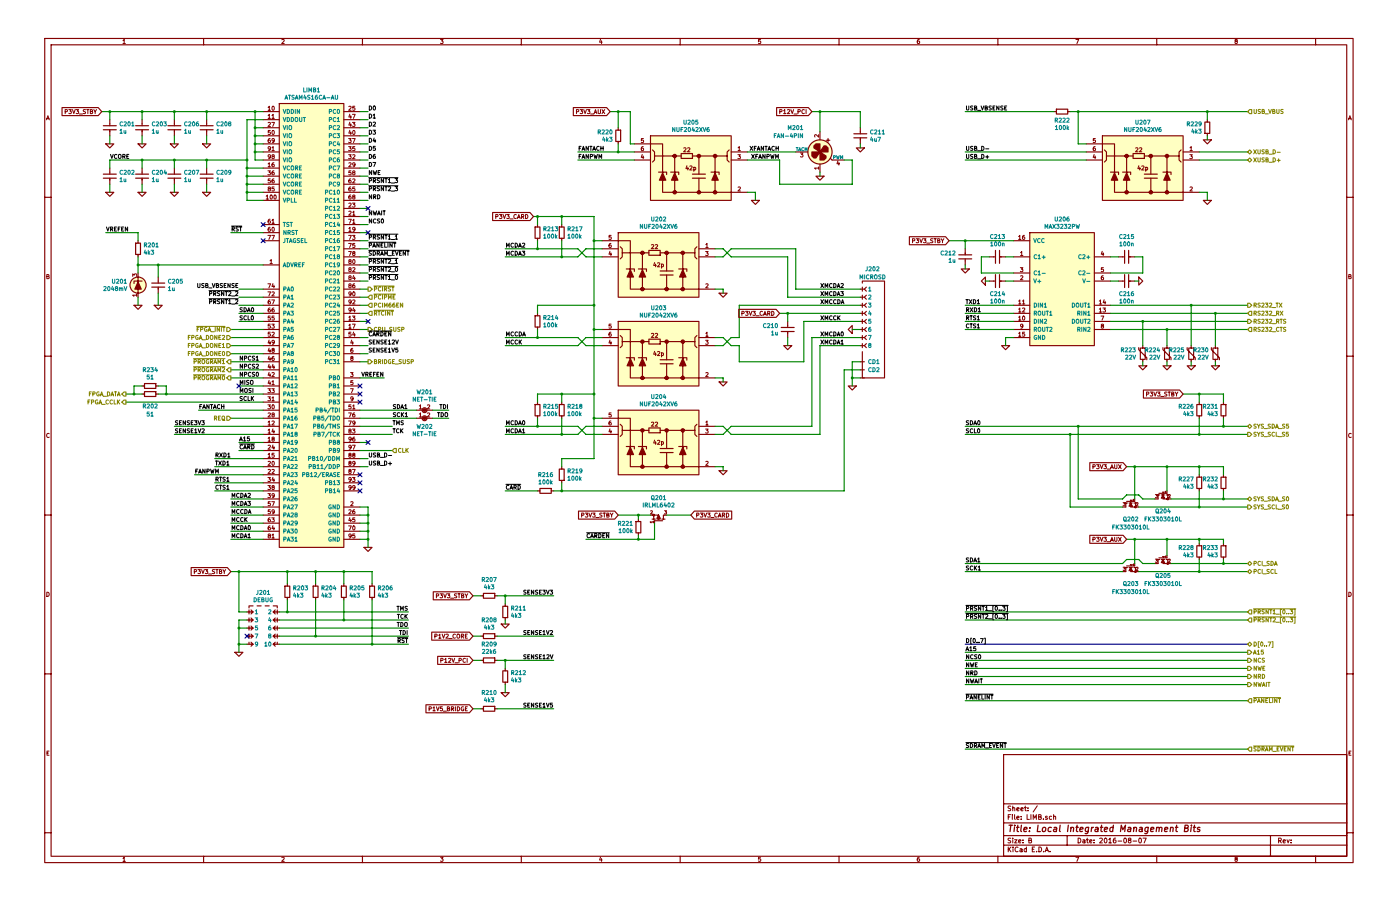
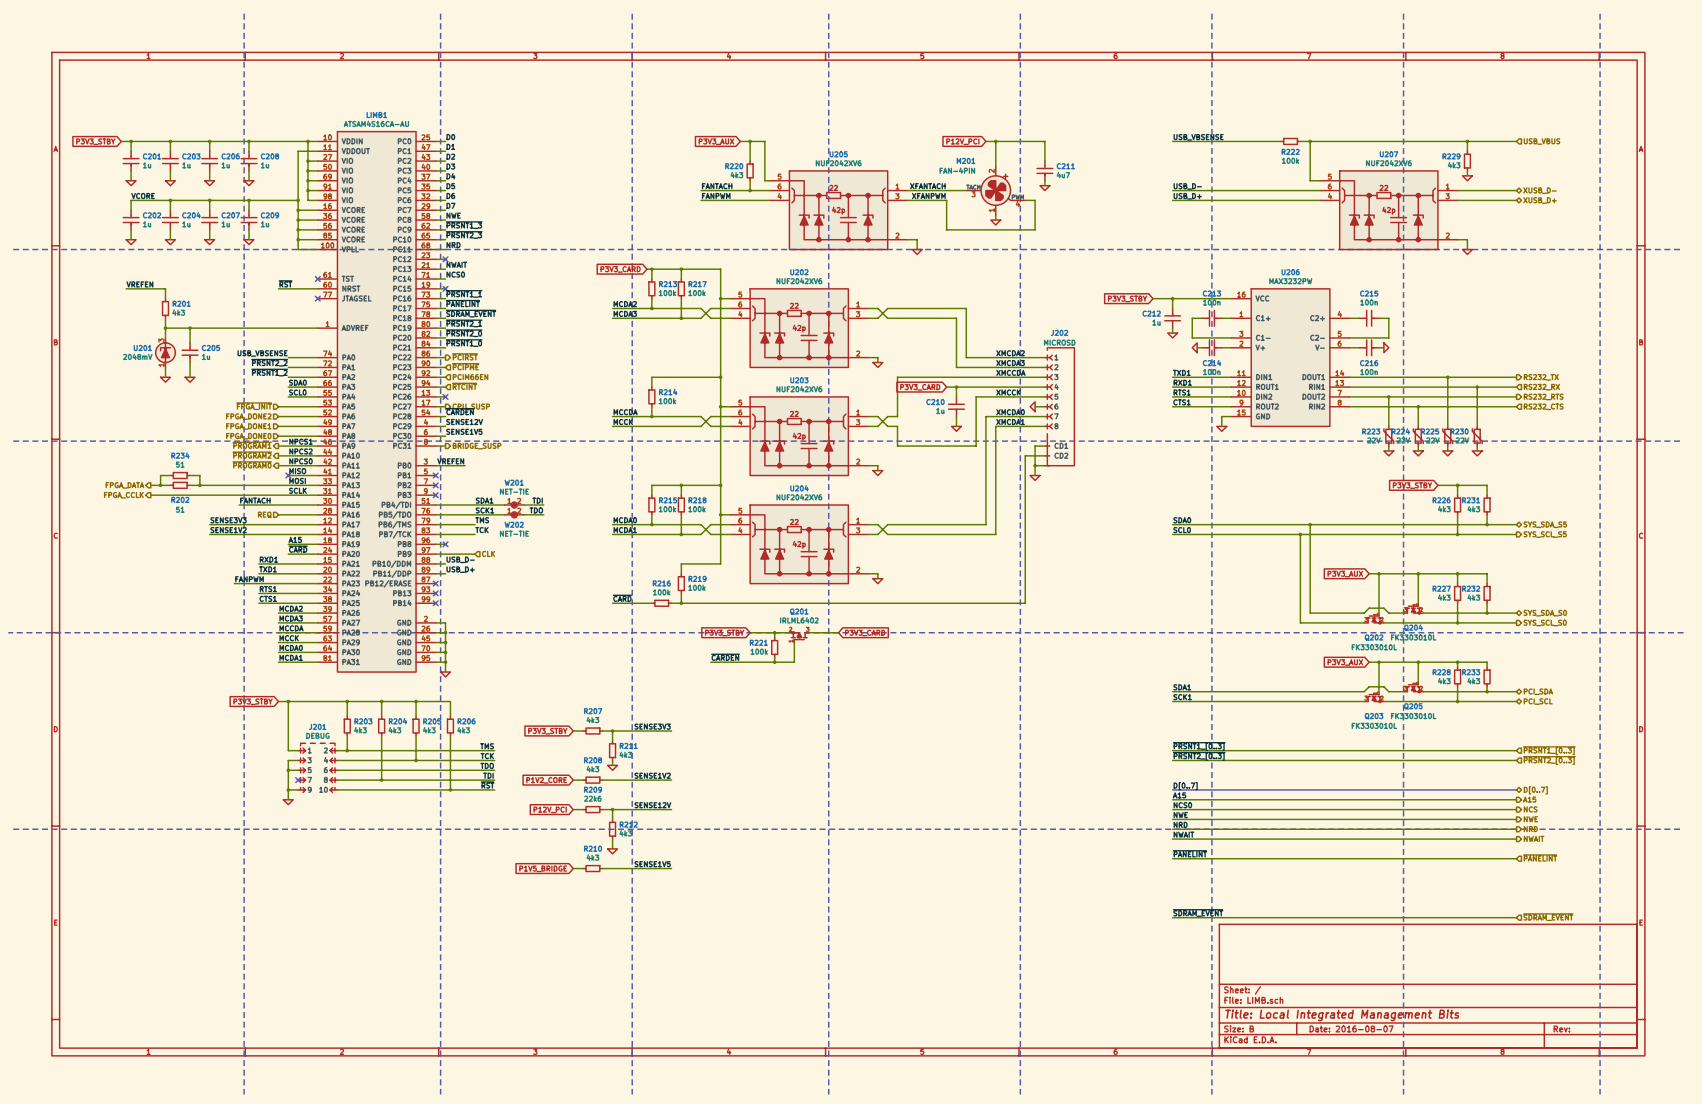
line: none -> (244, 13) (244, 1094)
line: none -> (440, 13) (440, 1094)
line: none -> (632, 13) (632, 1094)
line: none -> (828, 13) (828, 1094)
line: none -> (1020, 13) (1020, 1094)
line: none -> (1211, 13) (1211, 1094)
line: none -> (1403, 13) (1403, 1094)
line: none -> (1600, 13) (1600, 1094)
line: none -> (13, 249) (1683, 249)
line: none -> (13, 441) (1683, 441)
line: none -> (8, 632) (1683, 632)
line: none -> (13, 829) (1683, 829)

